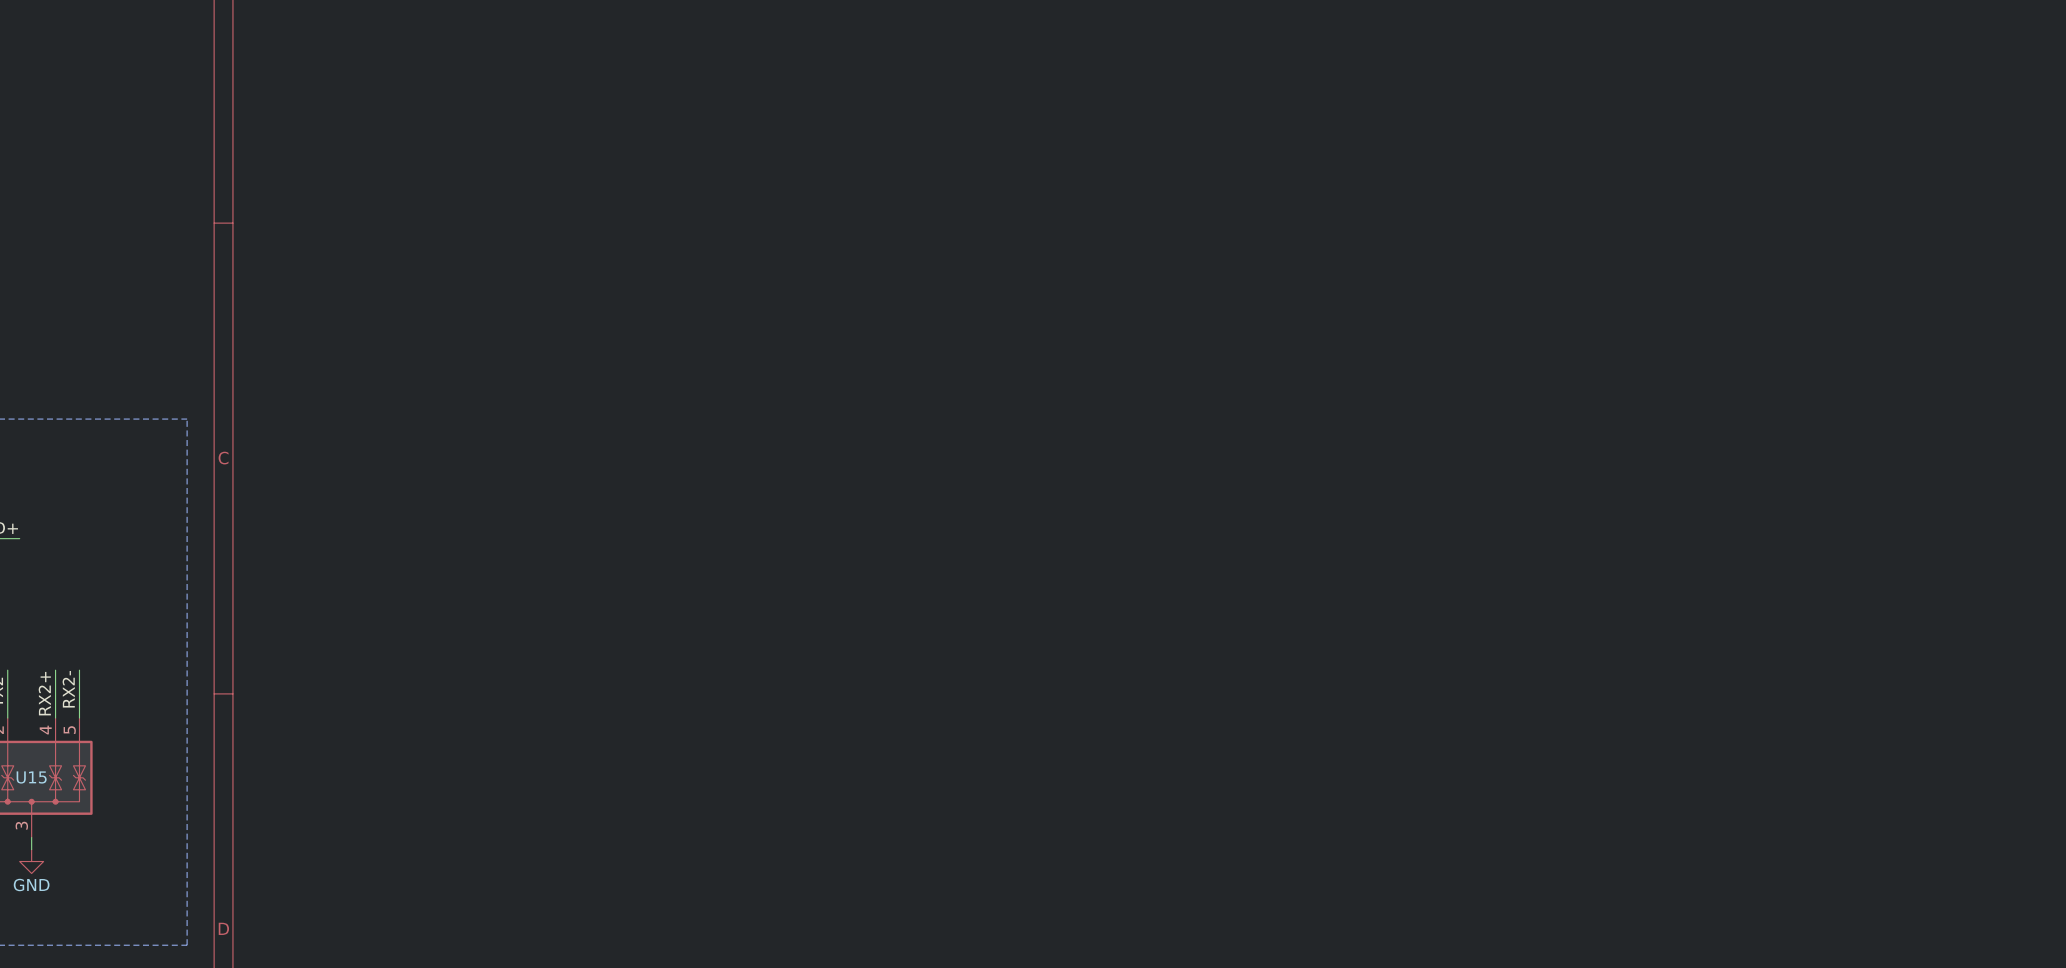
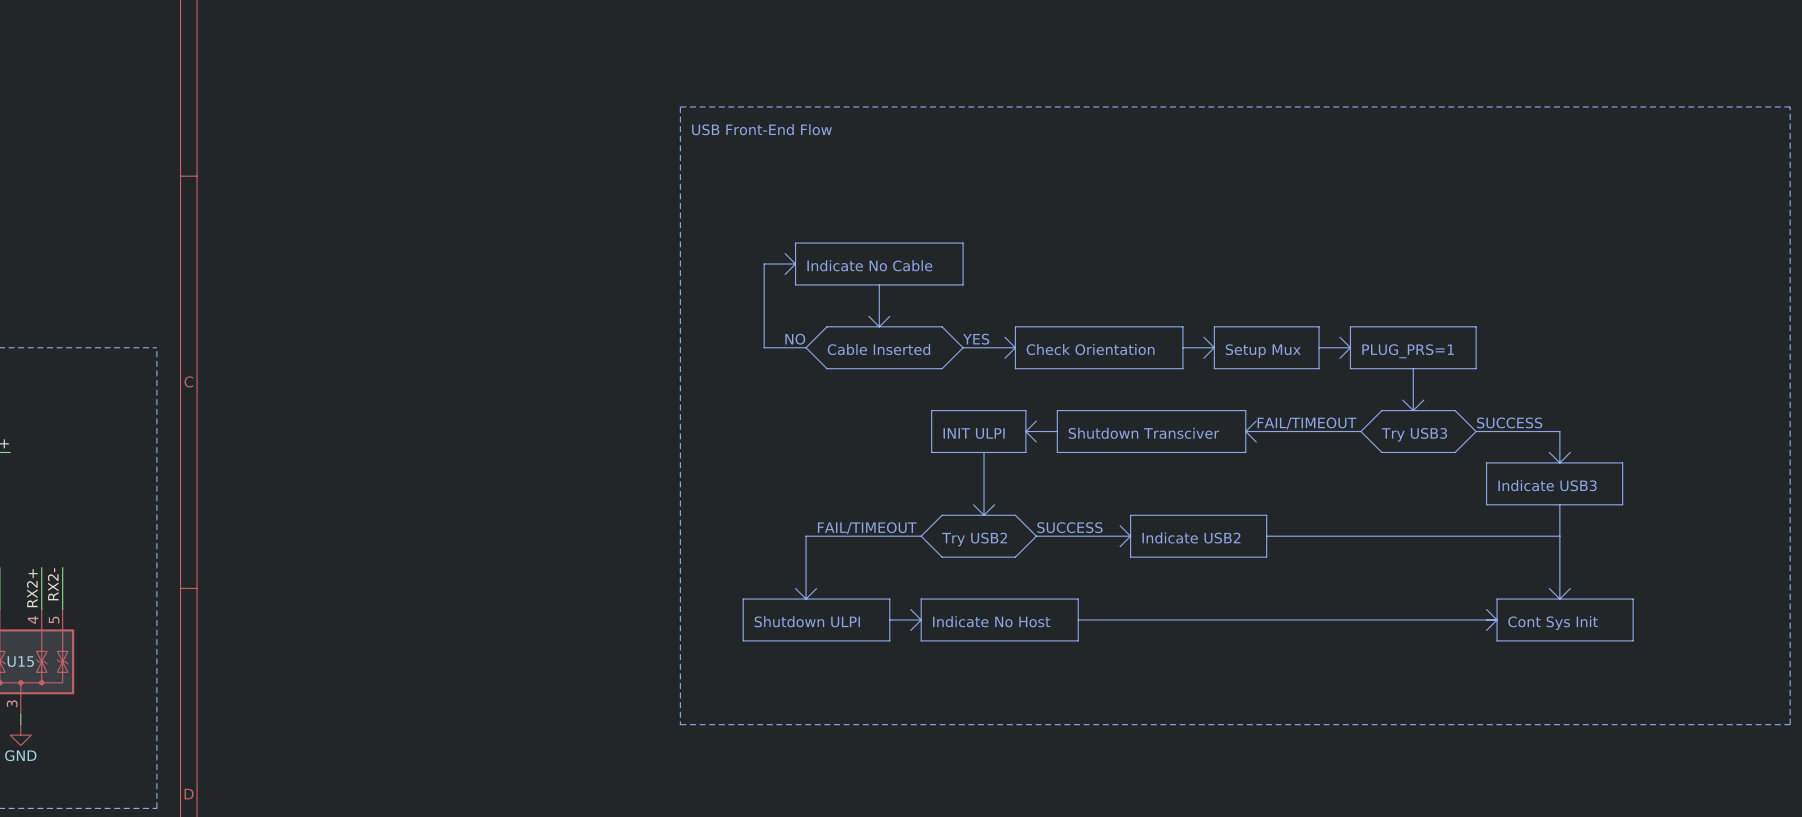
line: none -> (680, 106) (1790, 106) (1790, 724) (680, 724) (680, 106)
text: none -> USB Front-End Flow (761, 129)
line: none -> (795, 243) (795, 284) (963, 284) (963, 243) (795, 243)
line: none -> (785, 253) (795, 264)
line: none -> (795, 264) (785, 274)
line: none -> (795, 264) (764, 264) (764, 347) (806, 347)
text: none -> Indicate No Cable (869, 265)
line: none -> (879, 284) (879, 326)
line: none -> (868, 316) (879, 326)
line: none -> (889, 316) (879, 326)
line: none -> (1015, 326) (1182, 326) (1182, 368) (1015, 368) (1015, 326)
line: none -> (1214, 326) (1319, 326) (1319, 368) (1214, 368) (1214, 326)
line: none -> (1350, 326) (1350, 368) (1476, 368) (1476, 326) (1350, 326)
line: none -> (1004, 337) (1015, 347)
line: none -> (1203, 337) (1214, 347)
line: none -> (1339, 337) (1350, 347)
text: none -> NO (795, 339)
text: none -> YES (976, 339)
line: none -> (806, 347) (826, 326) (942, 326) (963, 347)
line: none -> (806, 347) (826, 368) (942, 368) (963, 347)
line: none -> (963, 347) (1015, 347)
line: none -> (1015, 347) (1004, 358)
line: none -> (1182, 347) (1214, 347)
line: none -> (1214, 347) (1203, 358)
line: none -> (1319, 347) (1350, 347)
line: none -> (1350, 347) (1339, 358)
text: none -> Cable Inserted (878, 349)
text: none -> Check Orientation (1090, 349)
text: none -> Setup Mux (1263, 351)
text: none -> PLUG_PRS=1 (1408, 351)
line: none -> (1413, 368) (1413, 410)
line: none -> (1402, 400) (1413, 410)
line: none -> (1423, 400) (1413, 410)
line: none -> (931, 410) (1025, 410) (1025, 452) (931, 452) (931, 410)
line: none -> (1057, 410) (1245, 410) (1245, 452) (1057, 452) (1057, 410)
line: none -> (1036, 421) (1025, 431)
line: none -> (1256, 421) (1245, 431)
text: none -> SUCCESS (1509, 422)
text: none -> FAIL/TIMEOUT (1307, 423)
line: none -> (1025, 431) (1057, 431)
line: none -> (1025, 431) (1036, 441)
line: none -> (1245, 431) (1360, 431)
line: none -> (1245, 431) (1256, 441)
line: none -> (1360, 431) (1381, 410) (1455, 410) (1476, 431)
line: none -> (1360, 431) (1381, 452) (1455, 452) (1476, 431)
line: none -> (1476, 431) (1559, 431) (1559, 462)
text: none -> Shutdown Transciver (1143, 433)
text: none -> INIT ULPI (974, 433)
text: none -> Try USB3 (1414, 434)
line: none -> (984, 452) (984, 515)
line: none -> (1549, 452) (1559, 462)
line: none -> (1570, 452) (1559, 462)
line: none -> (1486, 462) (1486, 504) (1622, 504) (1622, 462) (1486, 462)
text: none -> Indicate USB3 (1547, 485)
line: none -> (973, 504) (984, 515)
line: none -> (994, 504) (984, 515)
line: none -> (1559, 504) (1559, 599)
line: none -> (1130, 515) (1266, 515) (1266, 557) (1130, 557) (1130, 515)
line: none -> (1120, 525) (1130, 536)
text: none -> SUCCESS (1069, 527)
text: none -> FAIL/TIMEOUT (867, 528)
line: none -> (921, 536) (942, 515) (1015, 515) (1036, 536)
line: none -> (921, 536) (942, 557) (1015, 557) (1036, 536)
line: none -> (921, 536) (806, 536) (806, 599)
line: none -> (1036, 536) (1130, 536)
line: none -> (1130, 536) (1120, 546)
line: none -> (1266, 536) (1559, 536)
text: none -> Indicate USB2 (1191, 537)
text: none -> Try USB2 (974, 539)
line: none -> (795, 588) (806, 599)
line: none -> (816, 588) (806, 599)
line: none -> (1549, 588) (1559, 599)
line: none -> (1570, 588) (1559, 599)
line: none -> (743, 599) (889, 599) (889, 640) (743, 640) (743, 599)
line: none -> (921, 599) (1078, 599) (1078, 640) (921, 640) (921, 599)
line: none -> (1497, 599) (1633, 599) (1633, 640) (1497, 640) (1497, 599)
line: none -> (910, 609) (921, 619)
line: none -> (1486, 609) (1497, 619)
line: none -> (889, 619) (921, 619)
line: none -> (921, 619) (910, 630)
line: none -> (1078, 619) (1497, 619)
line: none -> (1497, 619) (1486, 630)
text: none -> Shutdown ULPI (807, 621)
text: none -> Indicate No Host (991, 621)
text: none -> Cont Sys Init (1553, 623)

